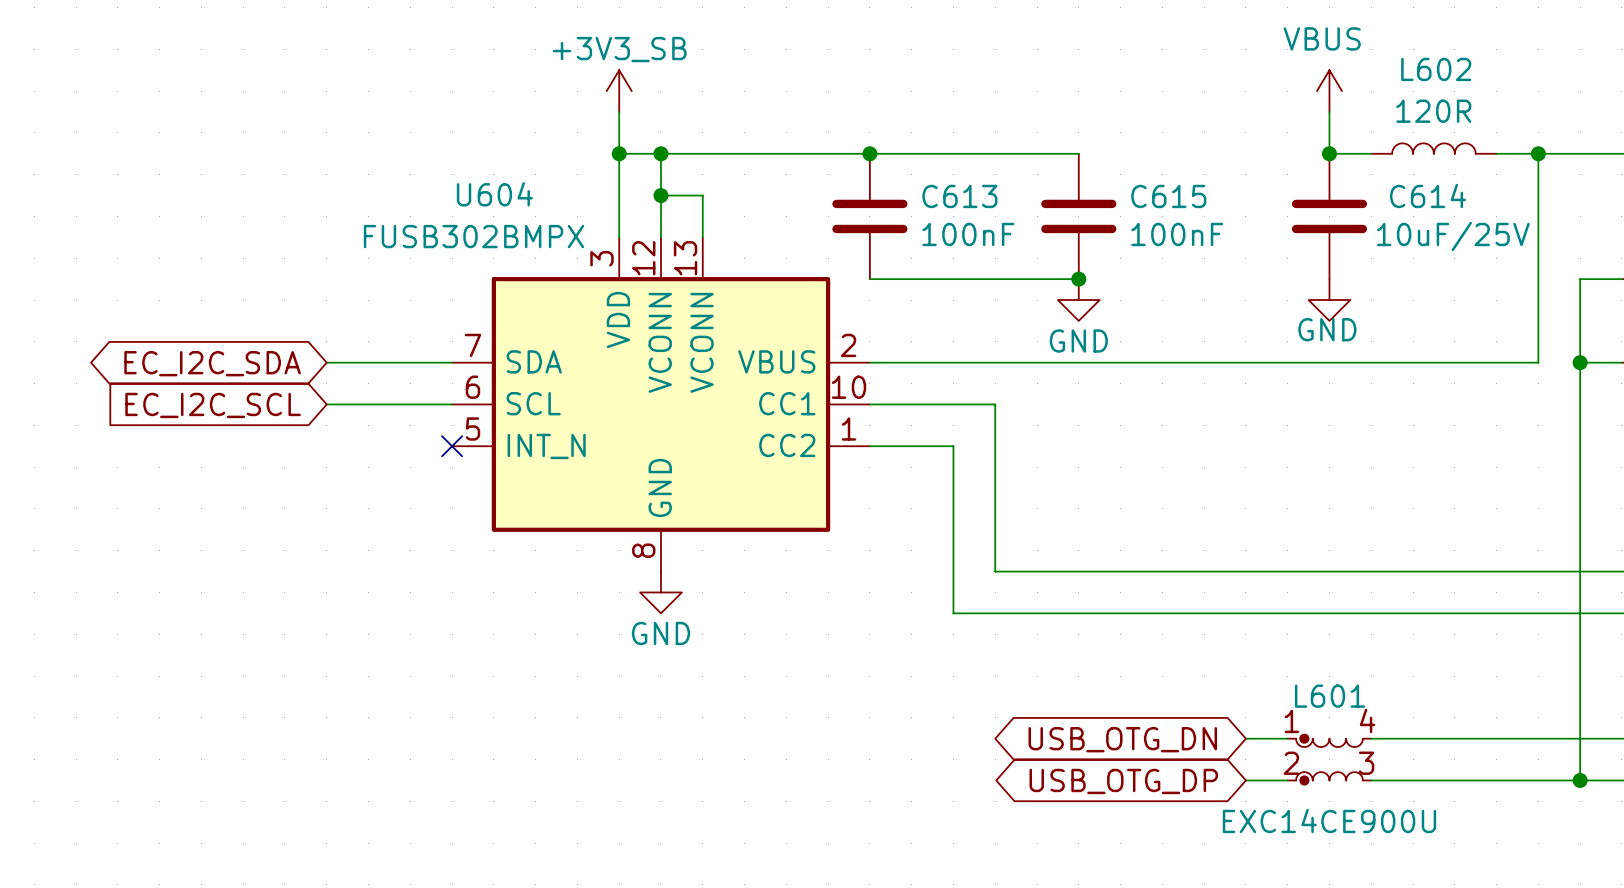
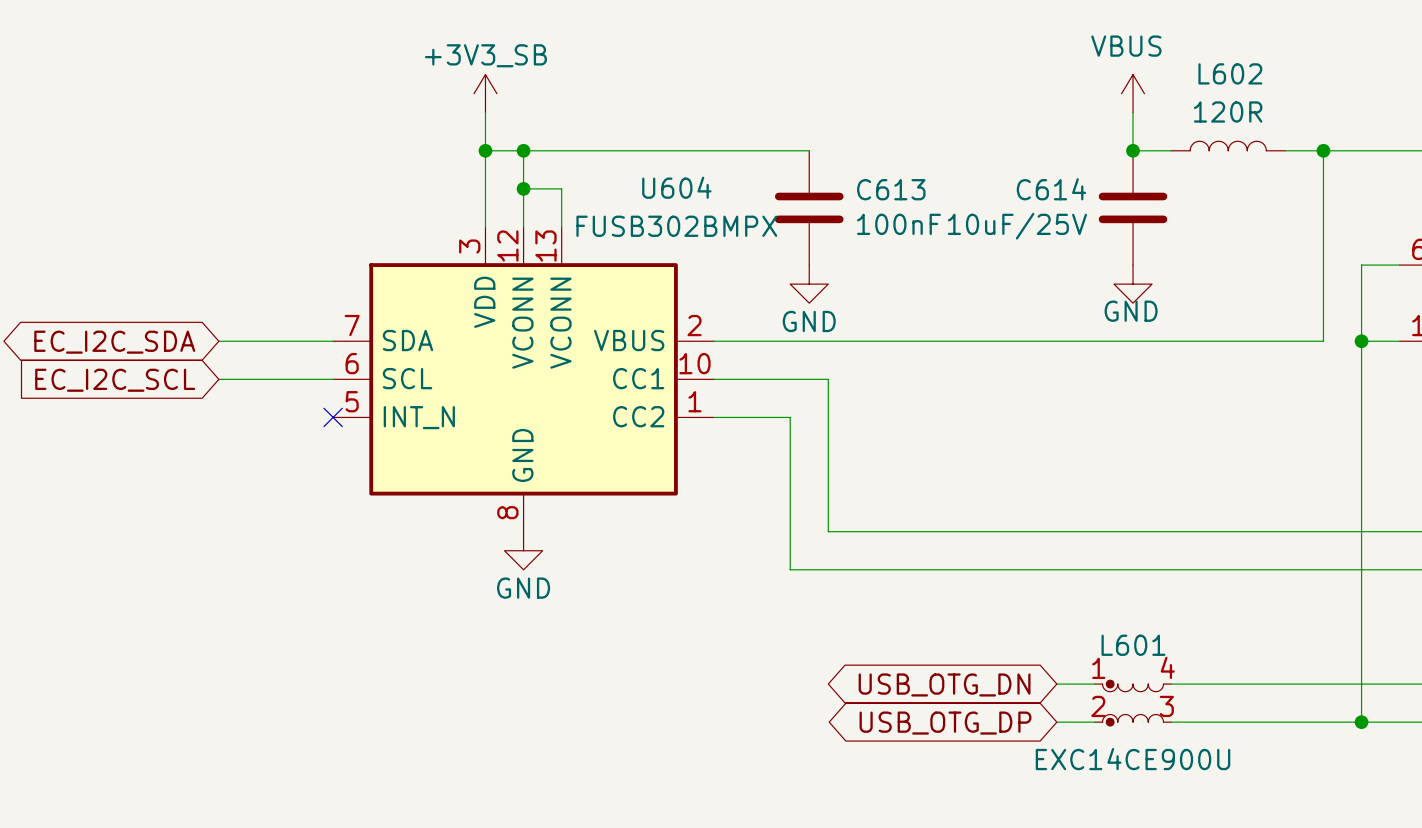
junction: (869, 153) -> none
wire: (974, 153) (1078, 153) -> none
U604 name position: U604 (494, 194) -> U604 (676, 187)
C614 name position: C614 (1427, 195) -> C614 (1051, 189)
C613 position: (869, 216) -> (809, 207)
C615: 100nF (1078, 216) -> none
U604 value position: FUSB302BMPX (473, 236) -> FUSB302BMPX (676, 226)
C614 value position: 10uF/25V (1453, 236) -> 10uF/25V (1017, 226)
wire: (869, 279) (1078, 279) -> none
junction: (1078, 279) -> none
power symbol position: GND (1078, 300) -> GND (809, 284)

